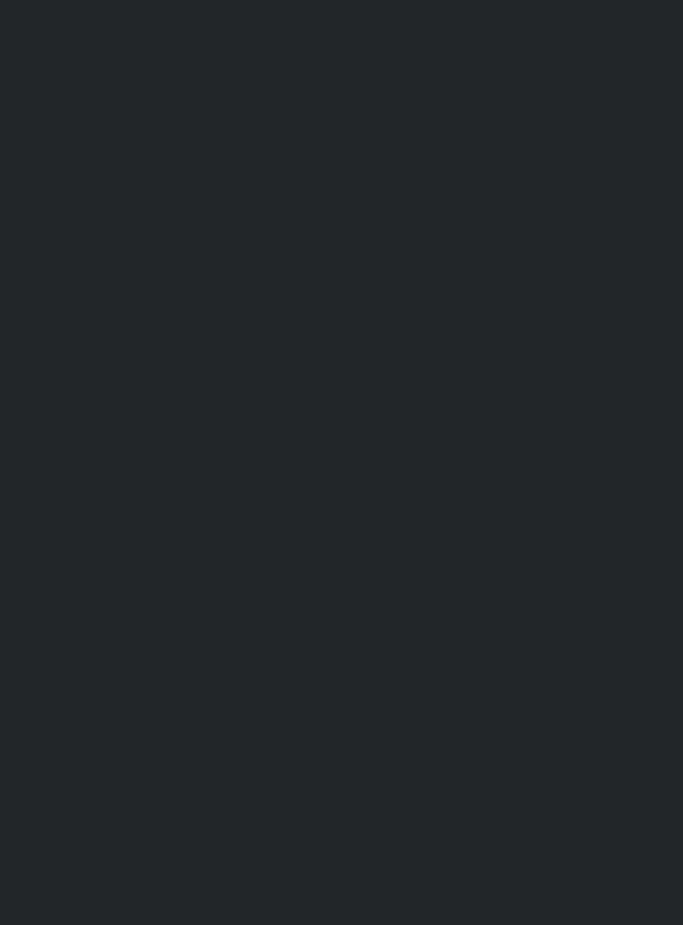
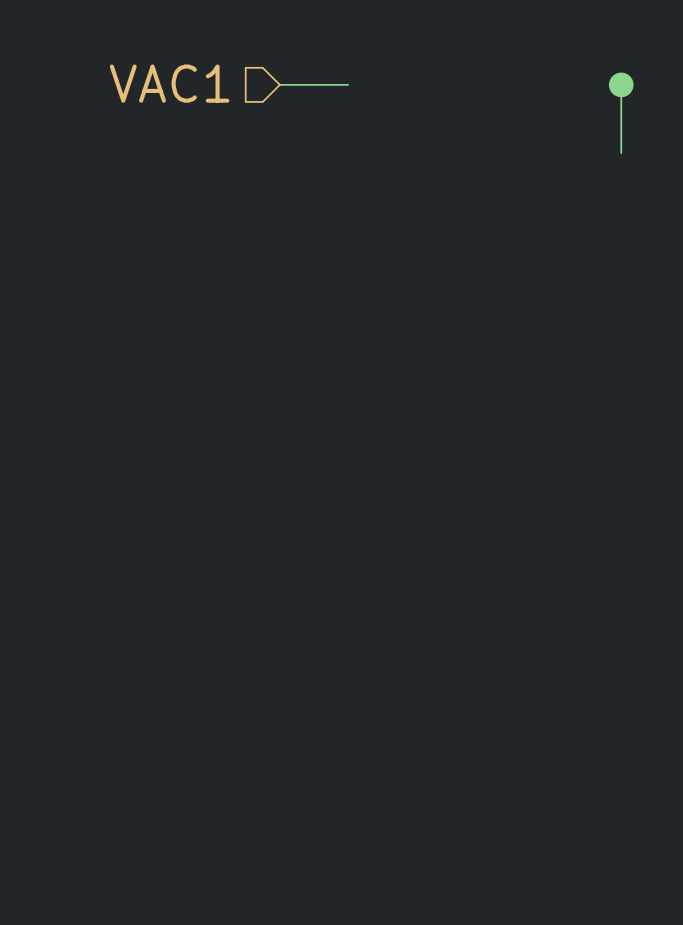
hierarchical label: none -> VAC1 (169, 83)
wire: none -> (279, 84) (348, 84)
wire: none -> (621, 84) (621, 153)
junction: none -> (621, 84)

